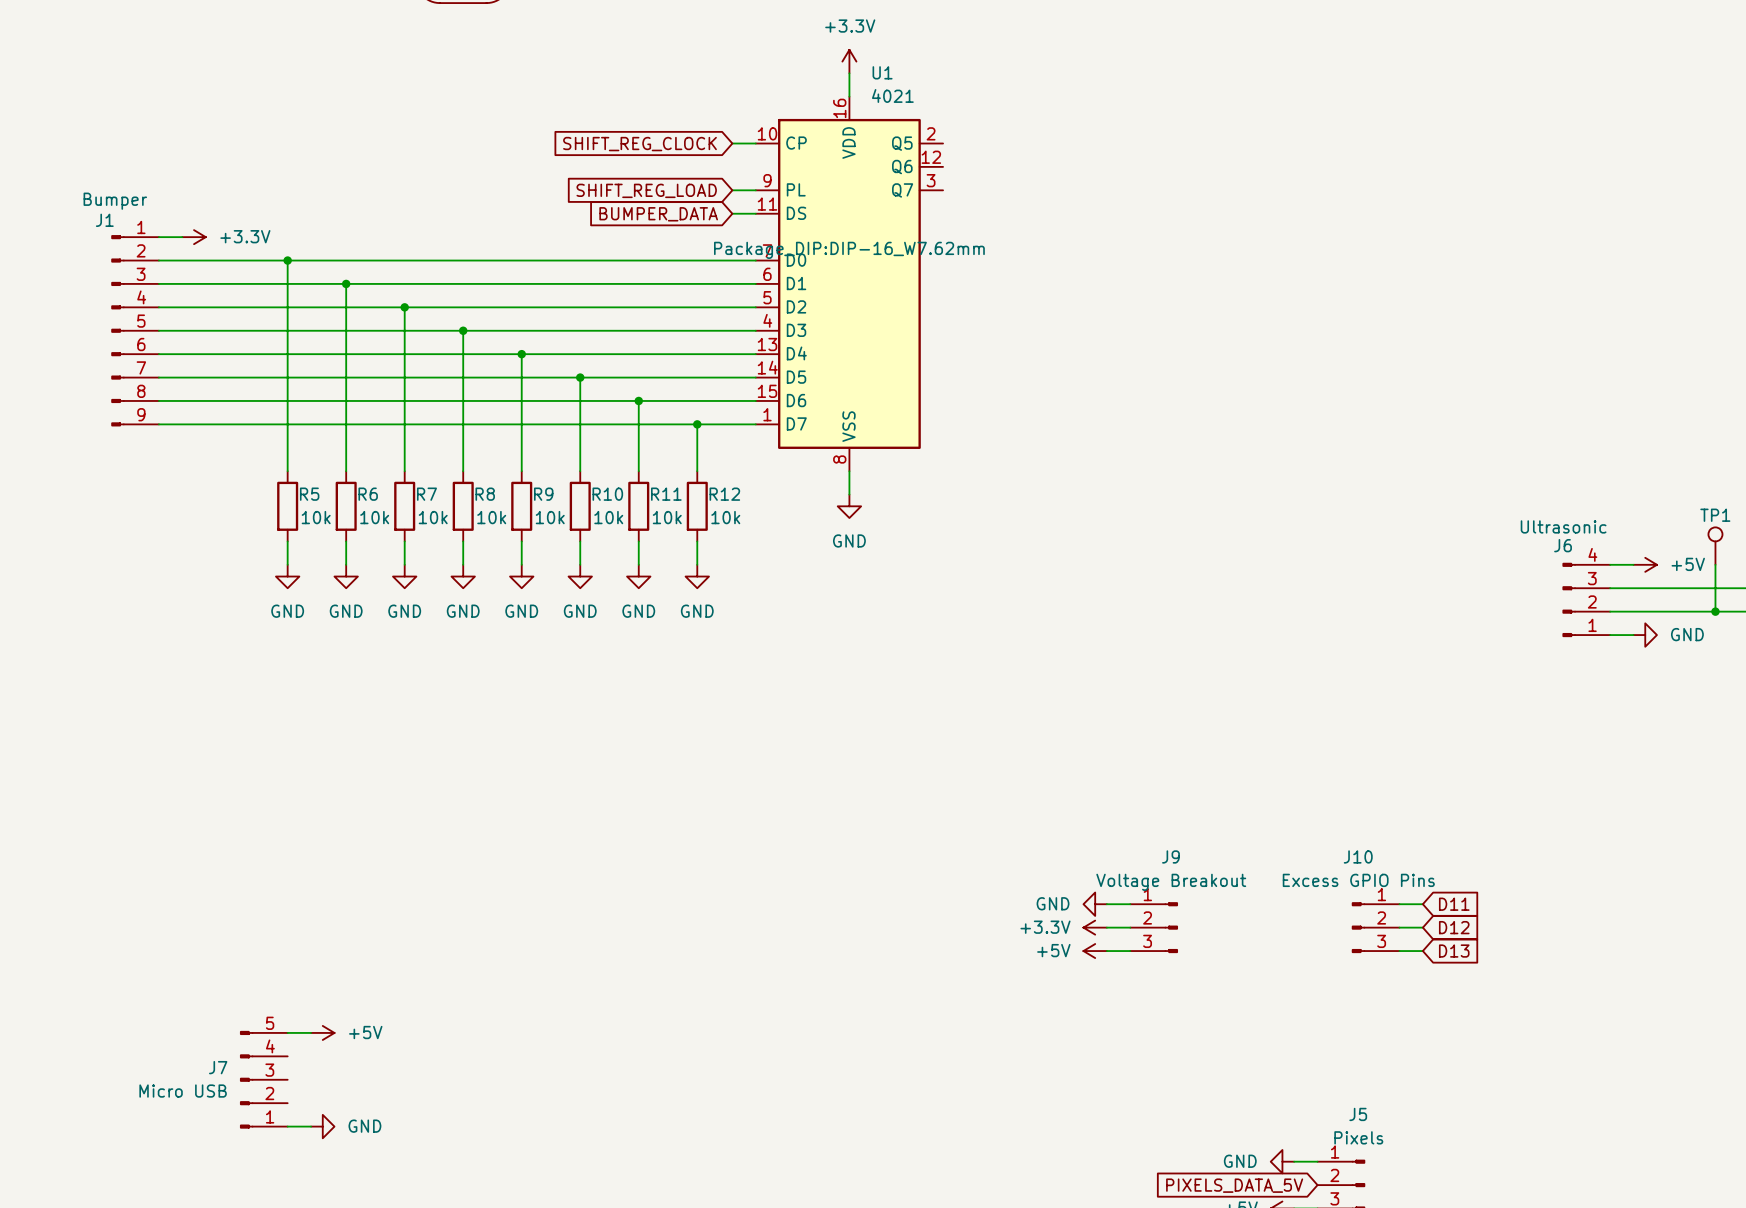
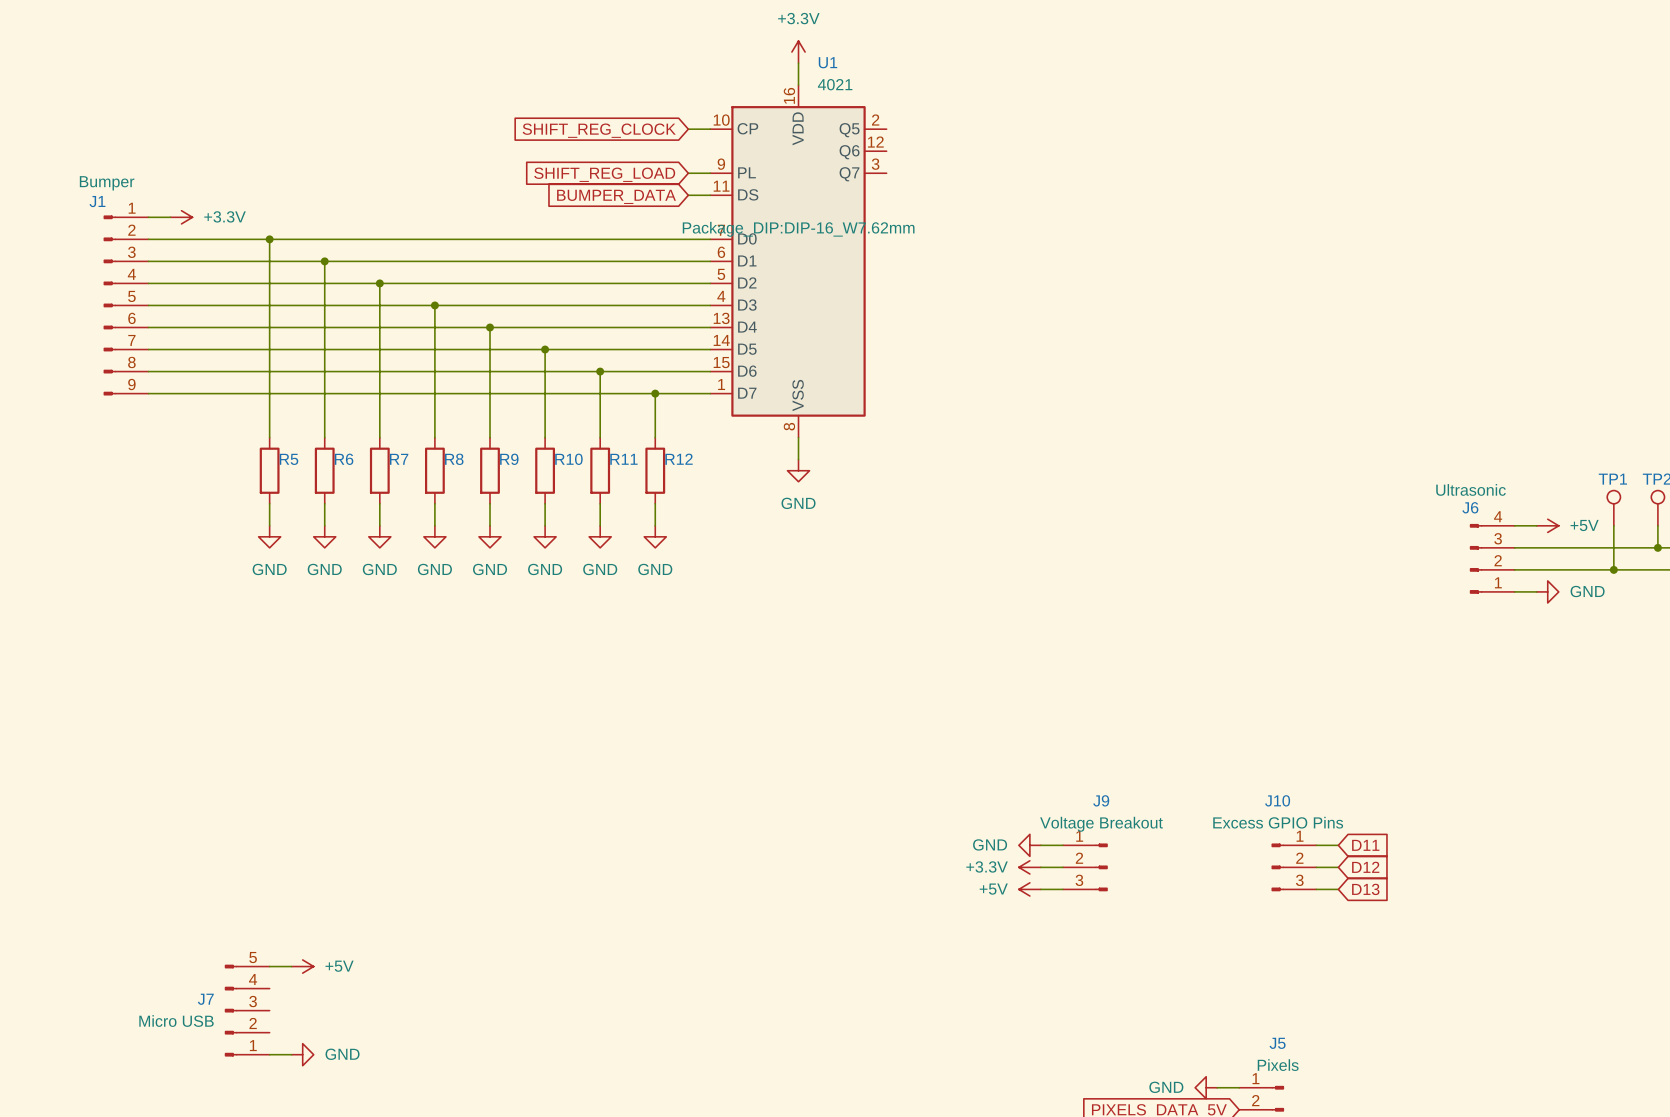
R5 value: 10k (316, 517) -> none
R6 value: 10k (374, 517) -> none
R7 value: 10k (433, 517) -> none
R8 value: 10k (491, 517) -> none
R9 value: 10k (550, 517) -> none
R10 value: 10k (608, 517) -> none
R11 value: 10k (667, 517) -> none
R12 value: 10k (725, 517) -> none

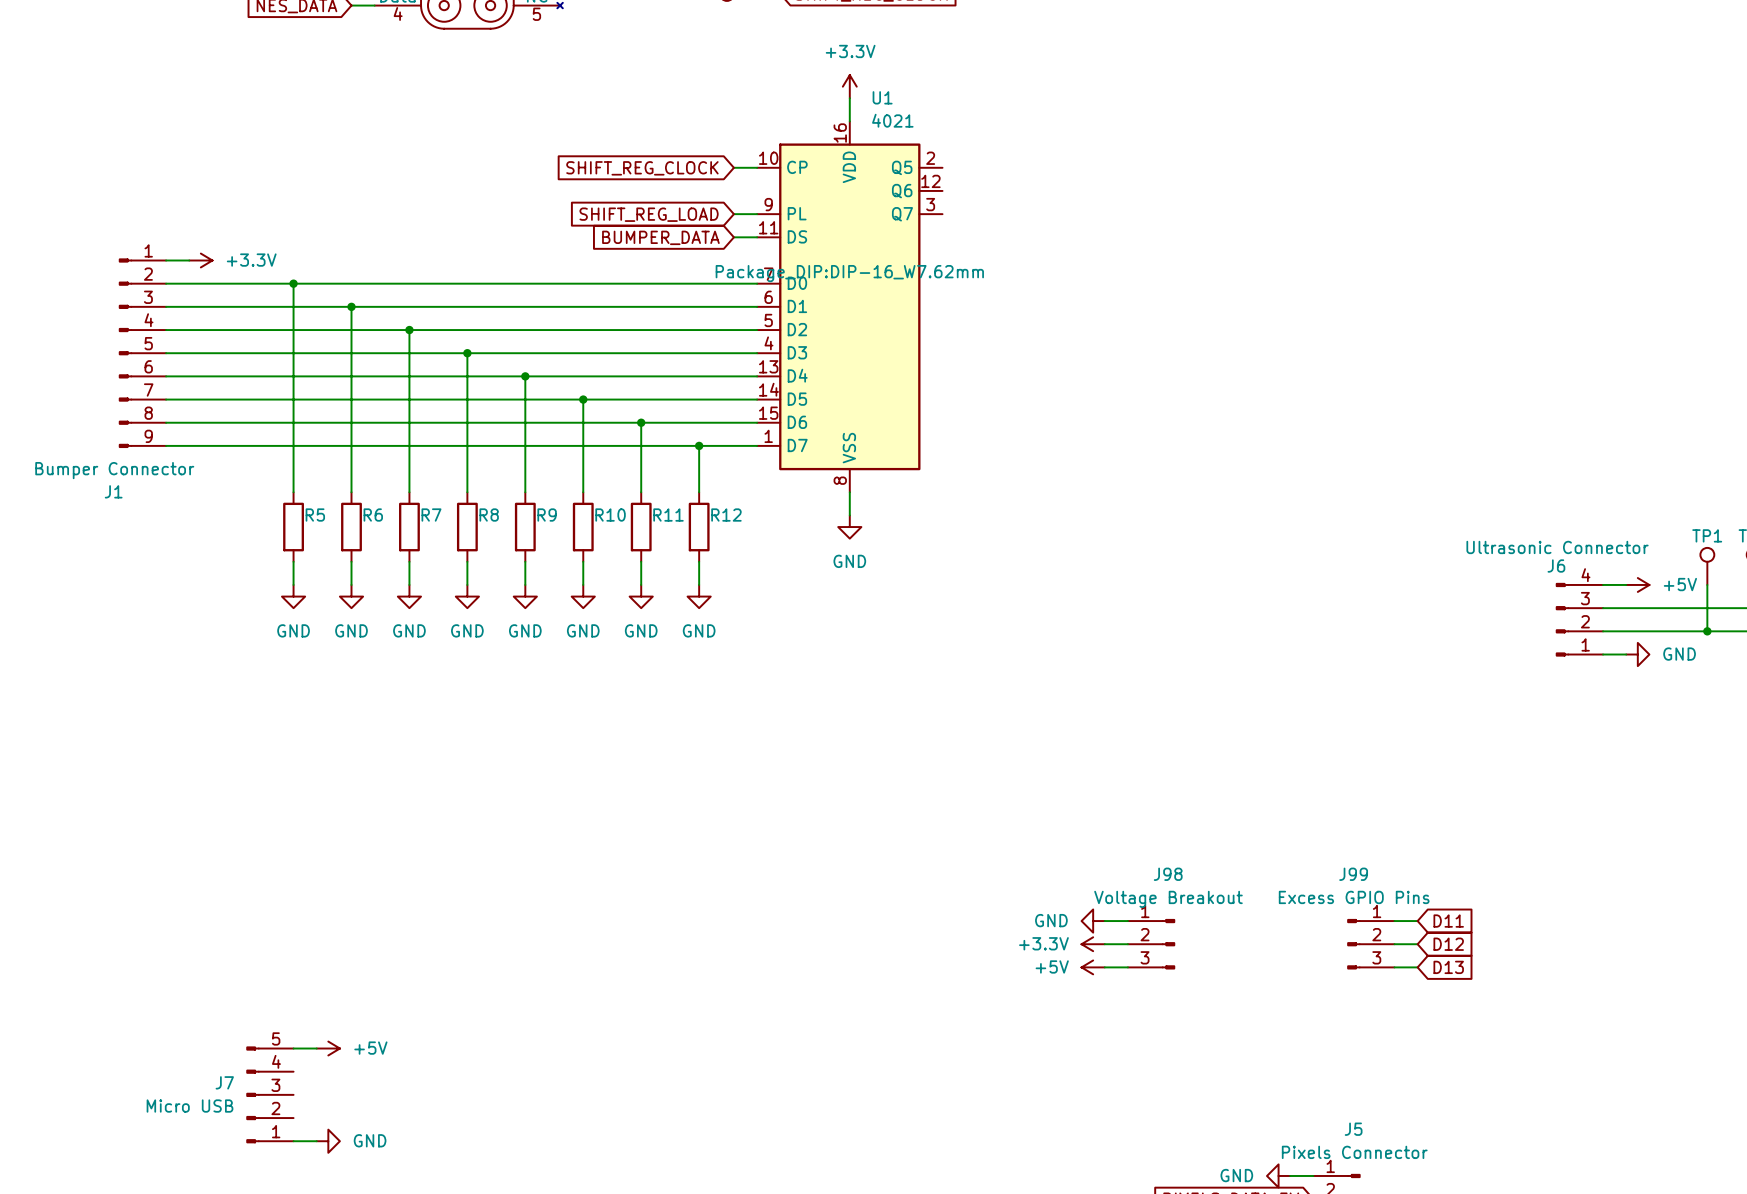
J1 value: Bumper (107, 183) -> Bumper Connector (114, 470)
J1 name position: J1 (97, 201) -> J1 (113, 491)
J6 value: Ultrasonic (1471, 489) -> Ultrasonic Connector (1557, 547)
J9 name: J9 (1101, 800) -> J98 (1168, 874)
J10 name: J10 (1277, 800) -> J99 (1353, 874)
J5 value: Pixels (1278, 1065) -> Pixels Connector (1354, 1152)

